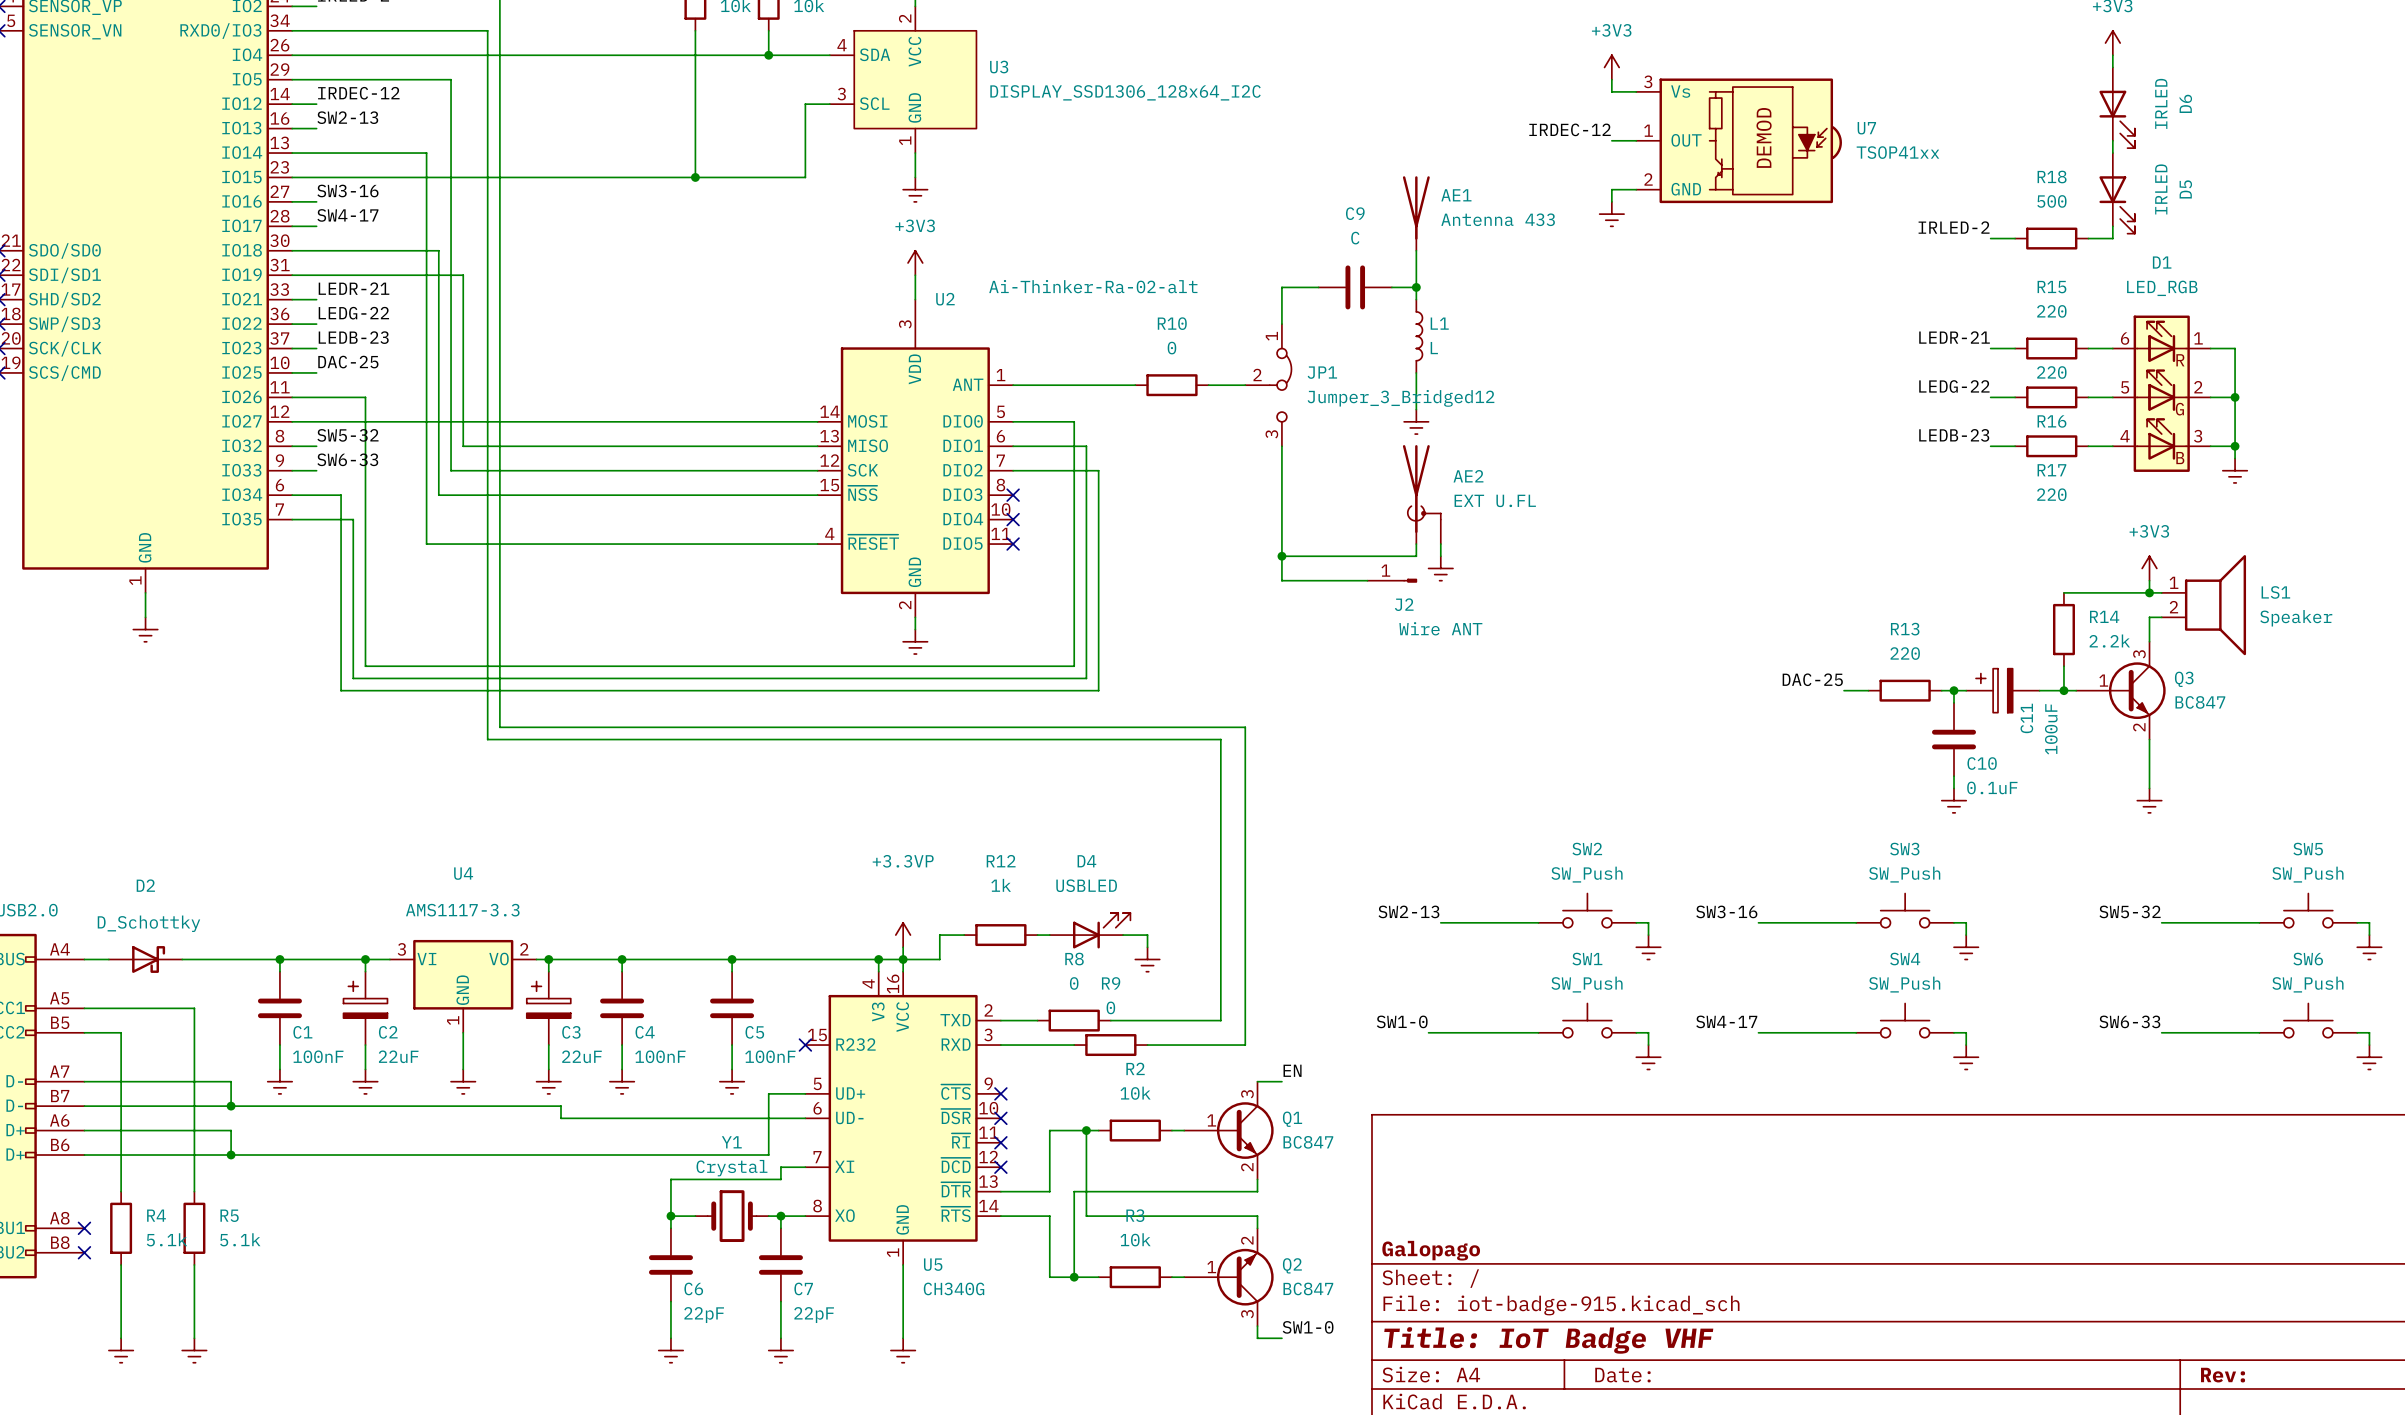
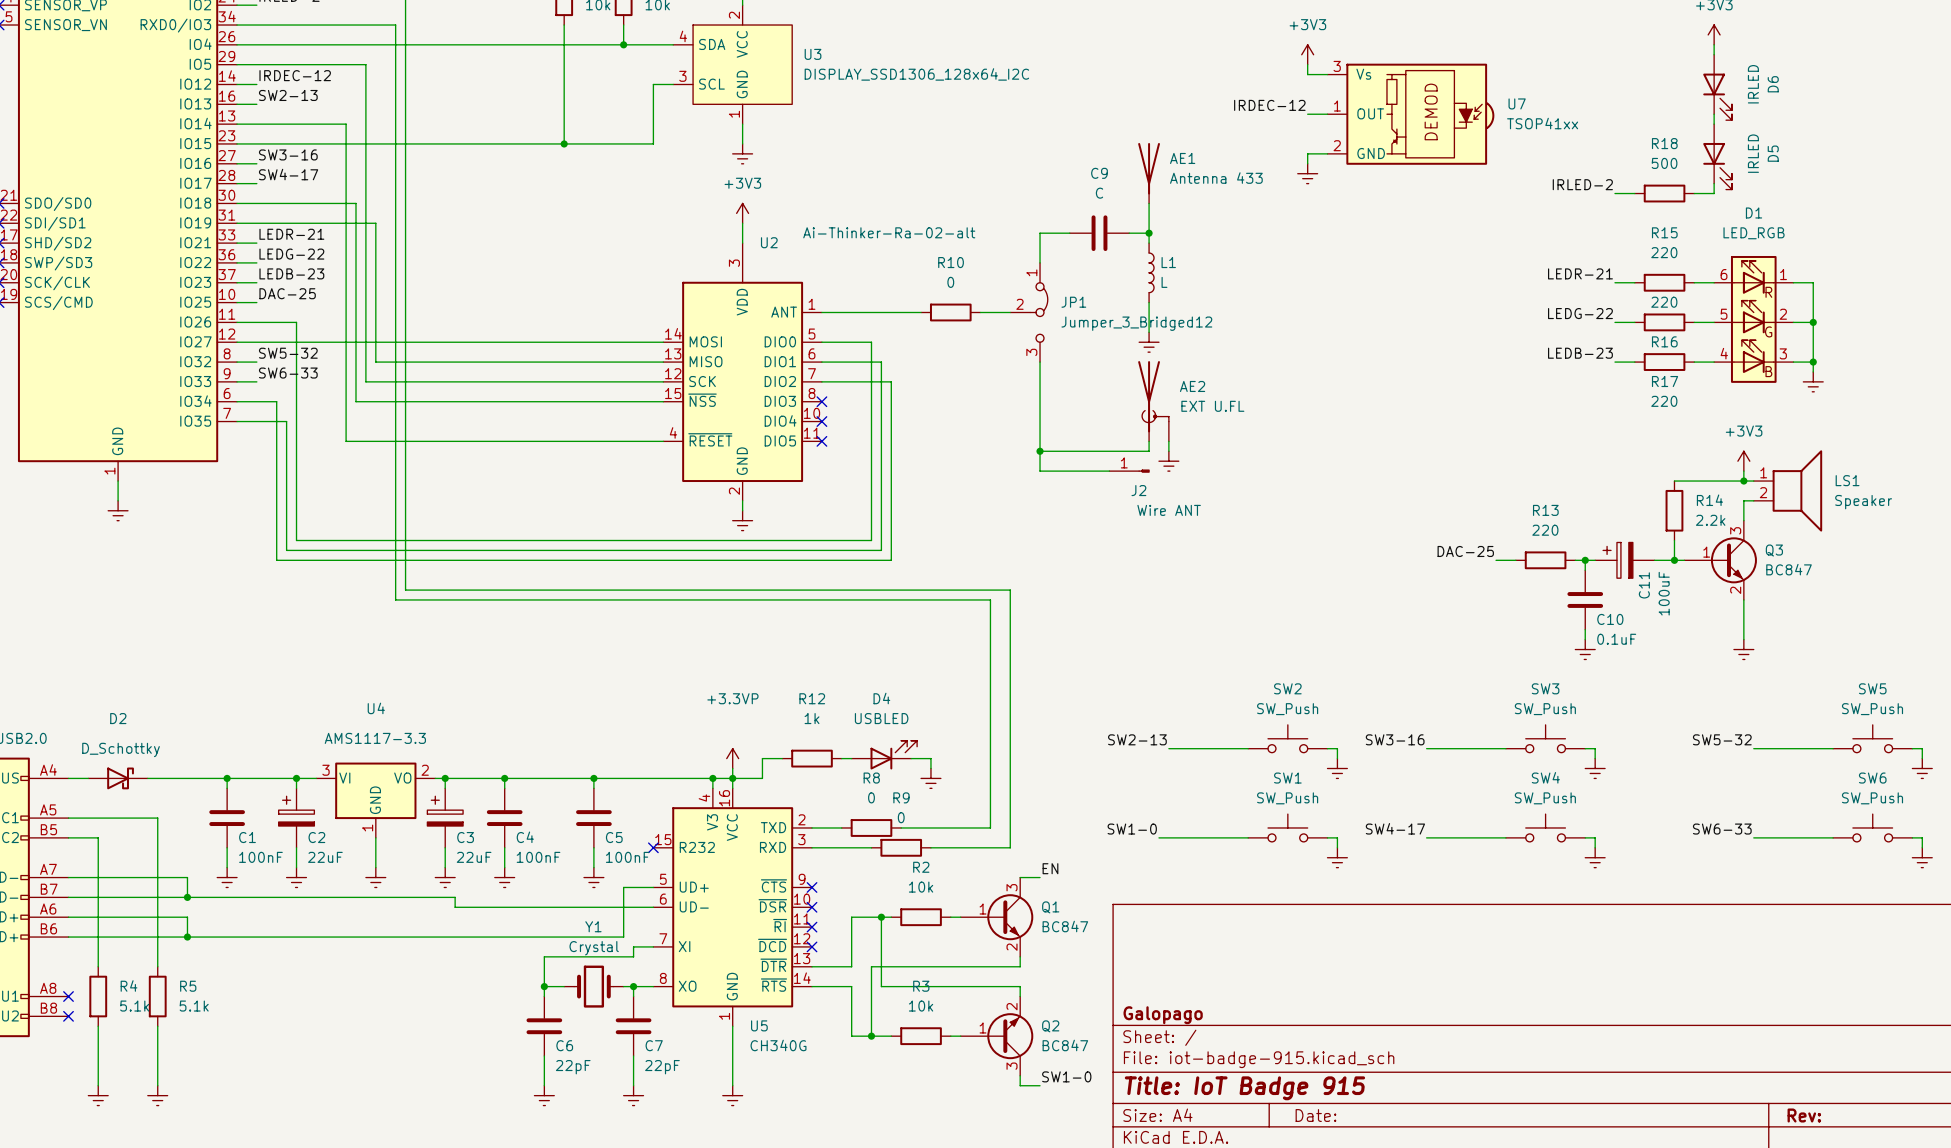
title block: Title: IoT Badge VHF (1548, 1340) -> Title: IoT Badge 915 (1244, 1088)

